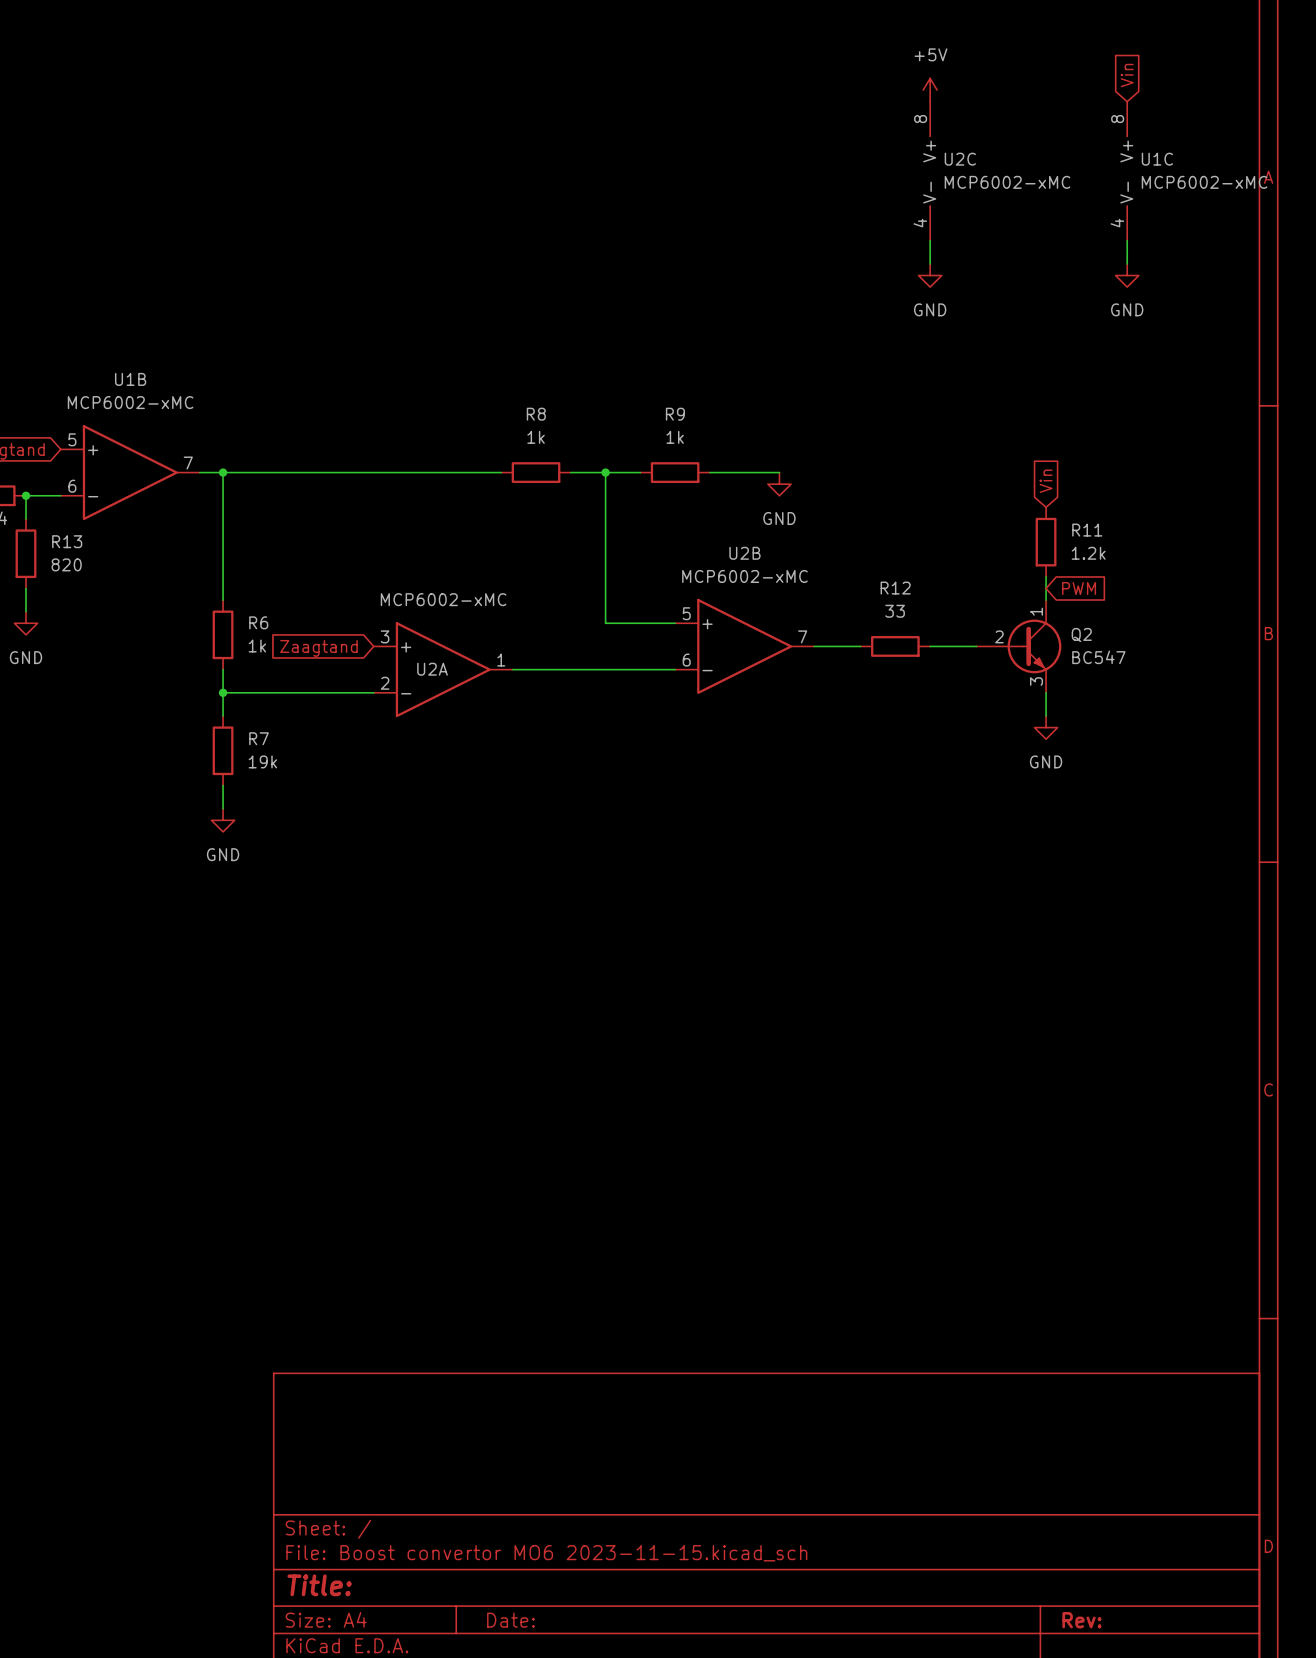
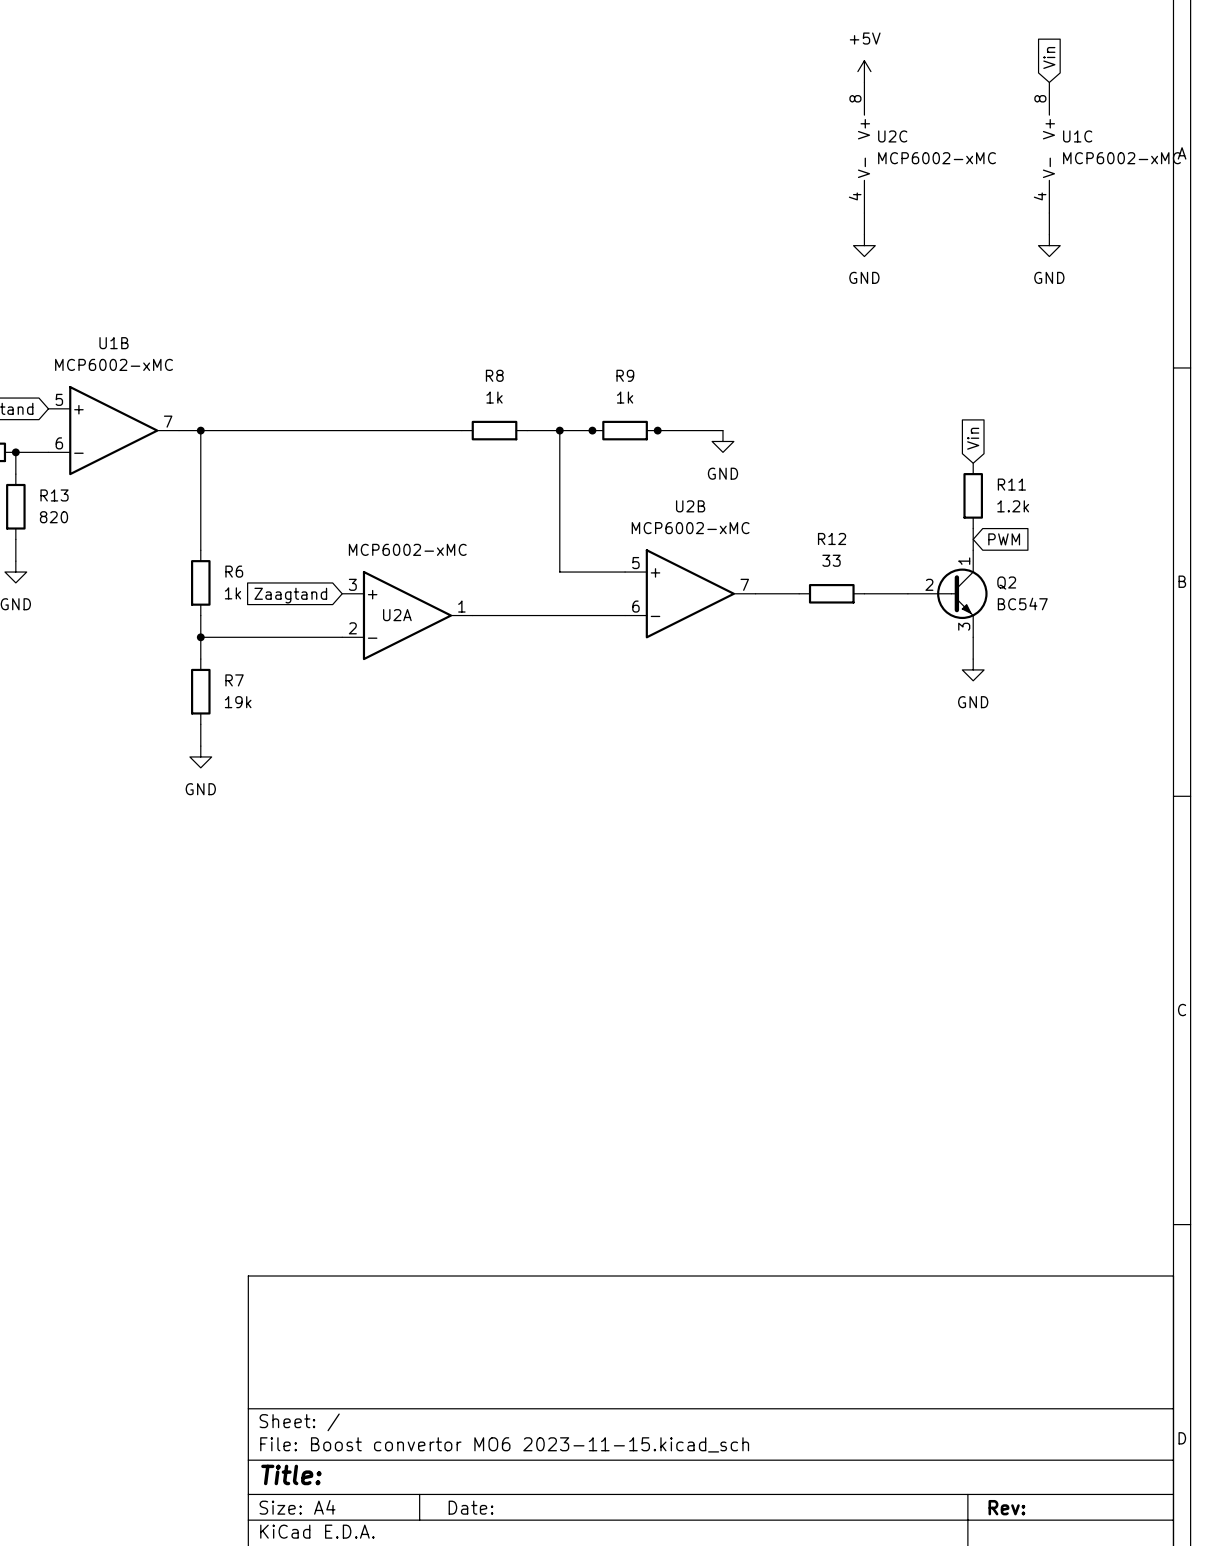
junction: none -> (592, 430)
junction: none -> (657, 430)

